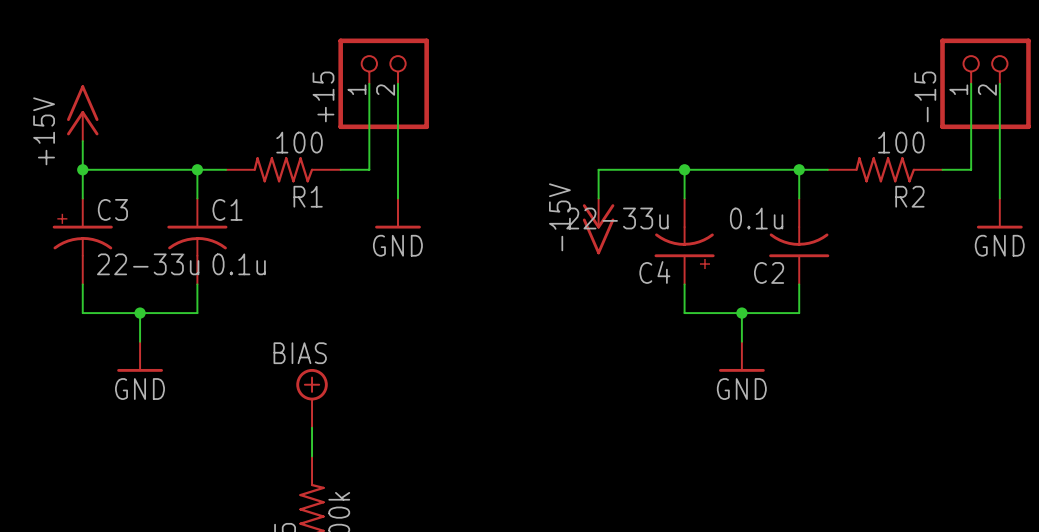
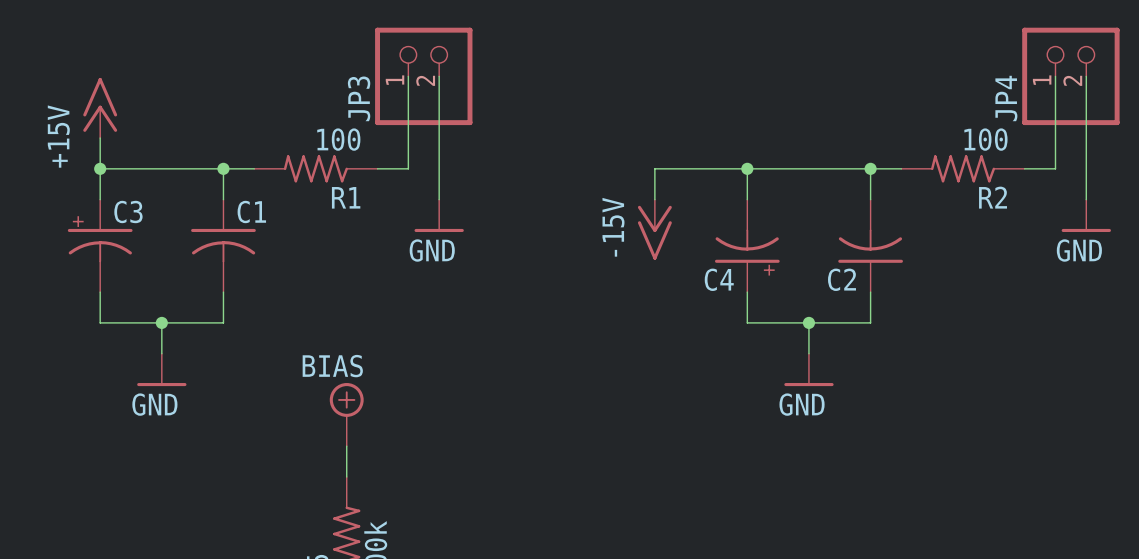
+15 name: +15 (323, 96) -> JP3 (359, 98)
-15 name: -15 (925, 96) -> JP4 (1006, 98)
C4 value: 22-33u (617, 218) -> none
C2 value: 0.1u (756, 218) -> none
C3 value: 22-33u (148, 264) -> none
C1 value: 0.1u (239, 264) -> none

